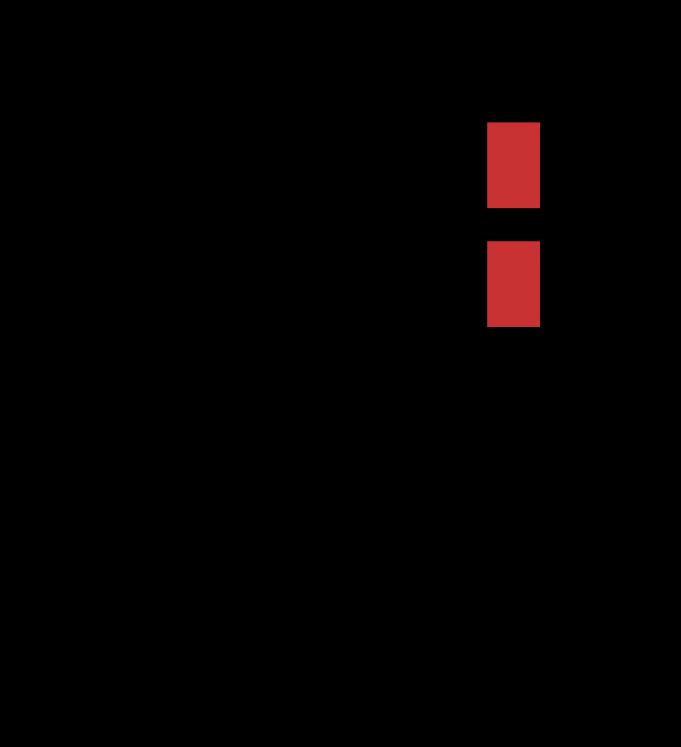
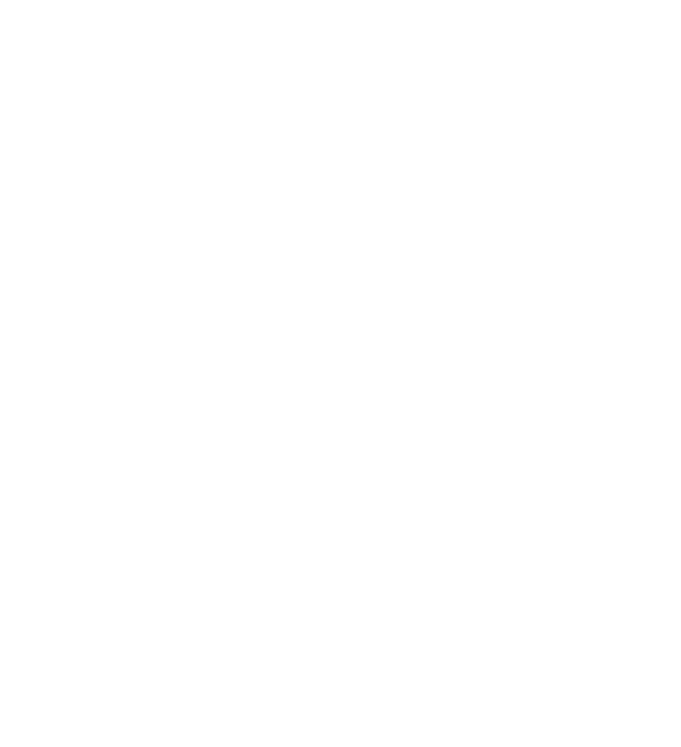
part: (513, 224) -> none

